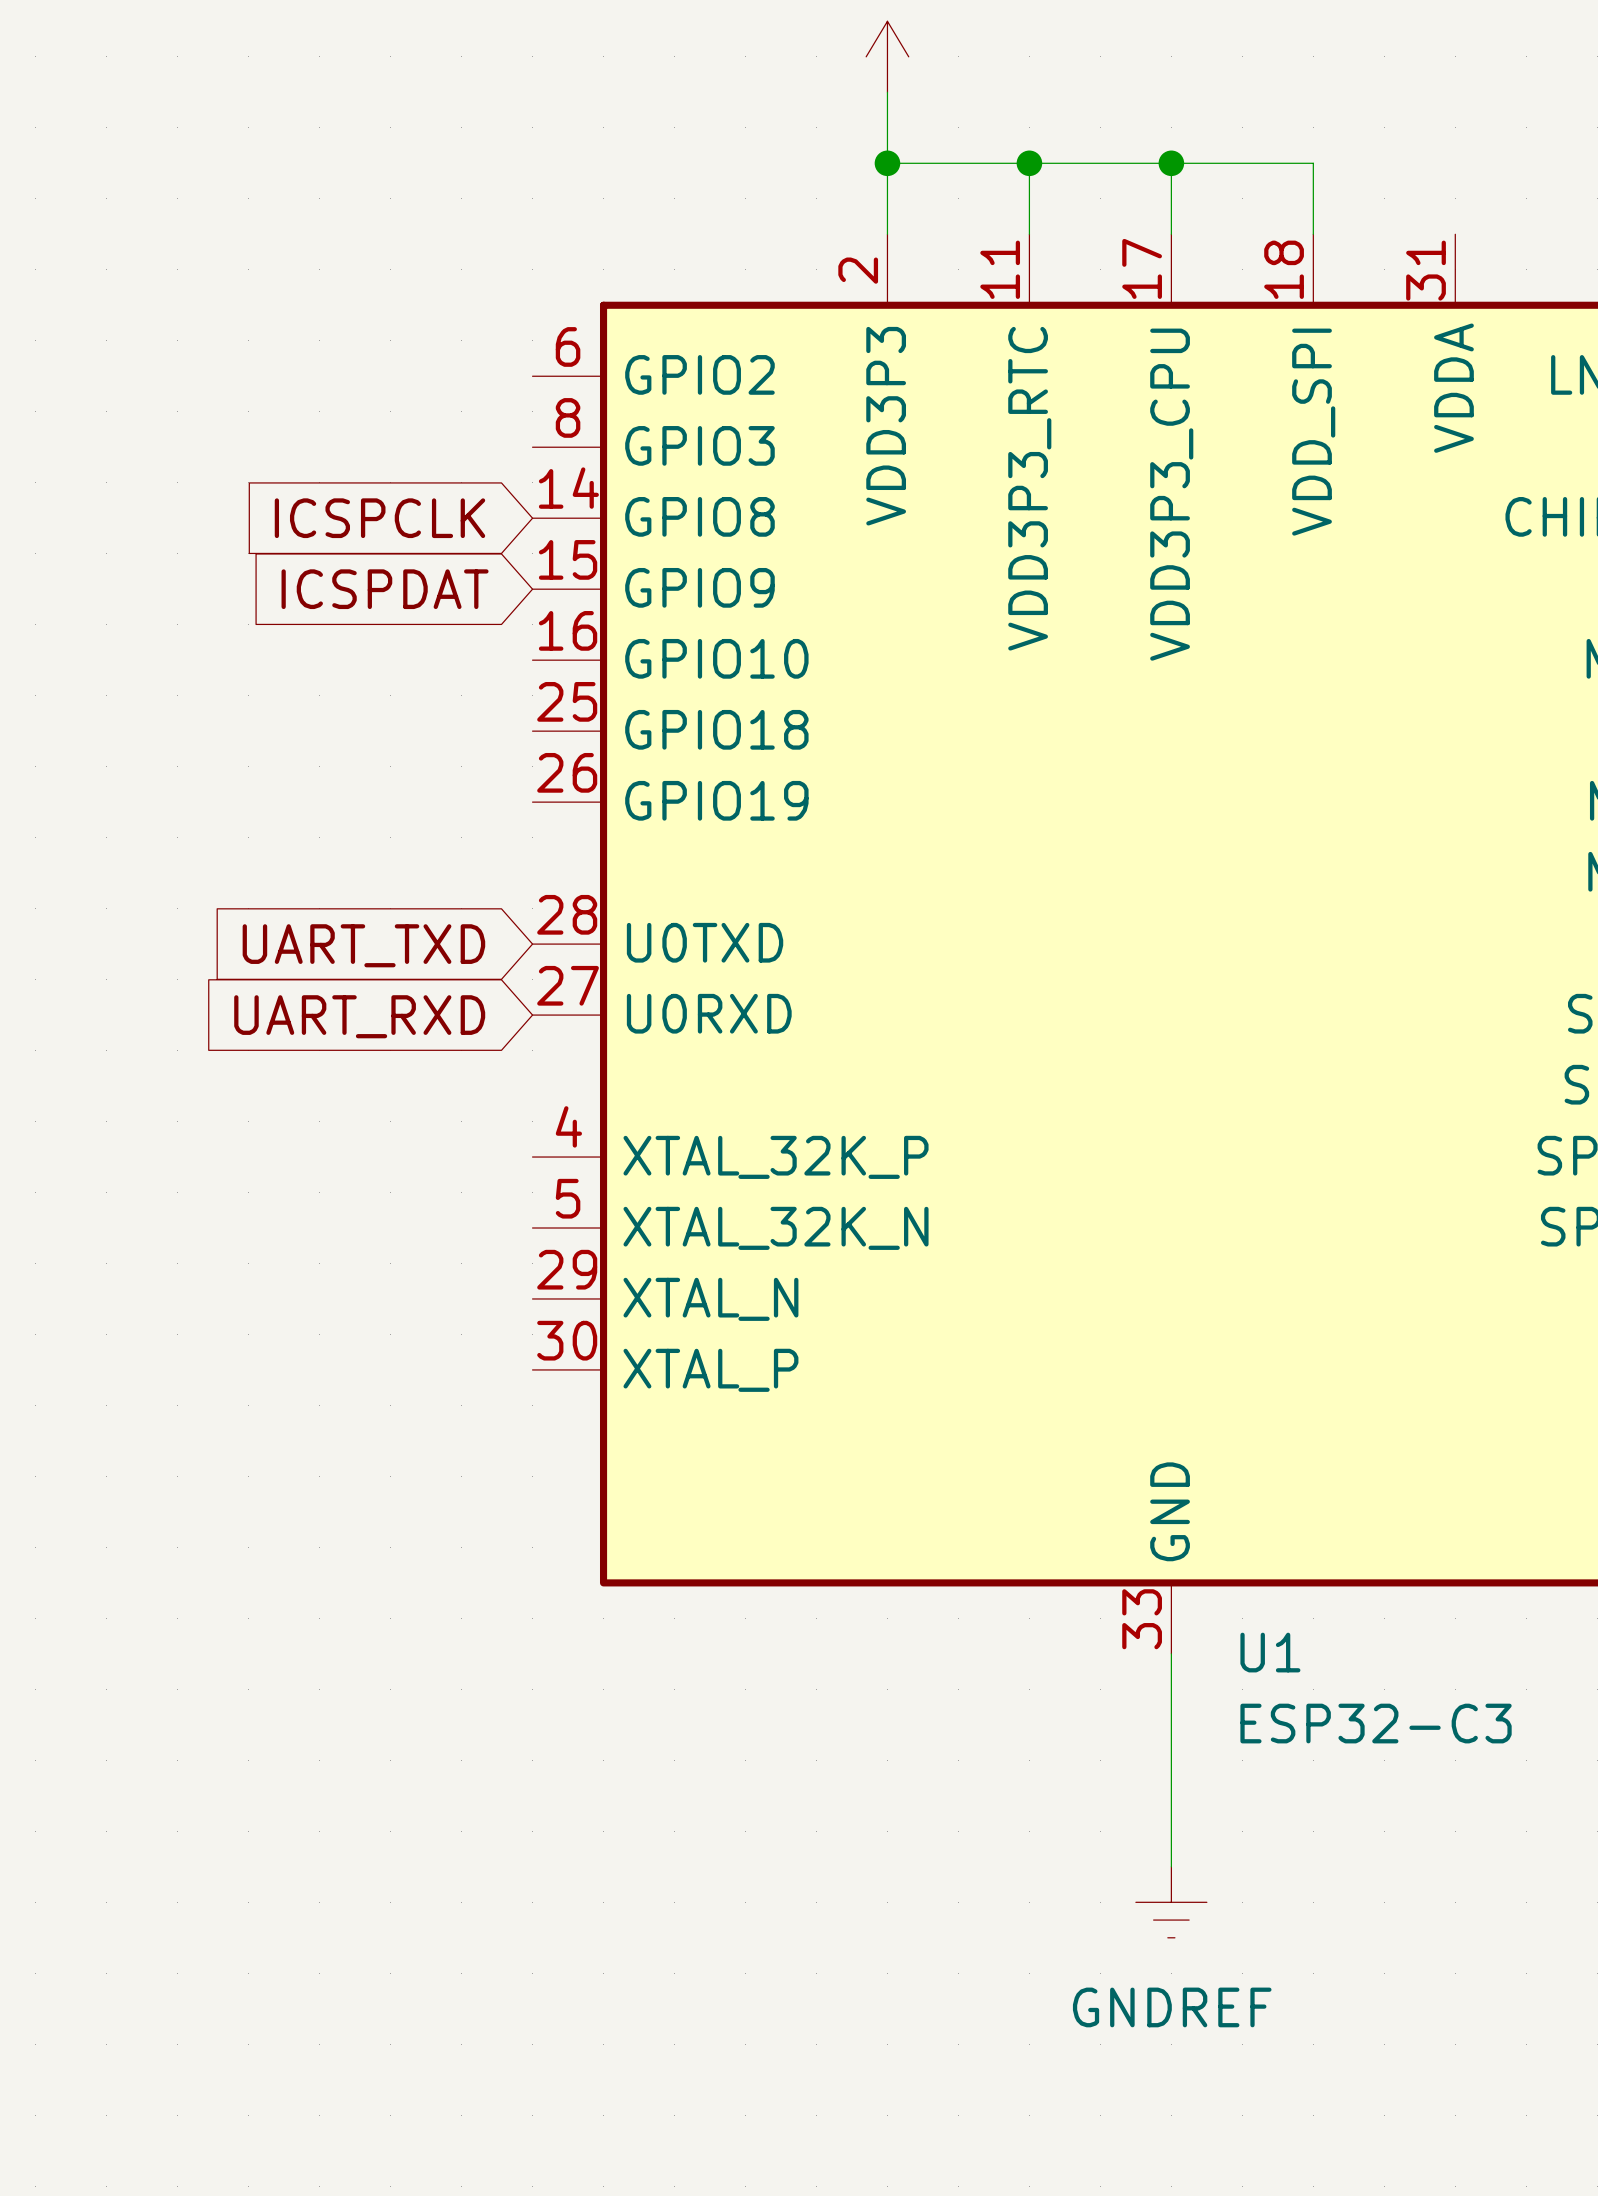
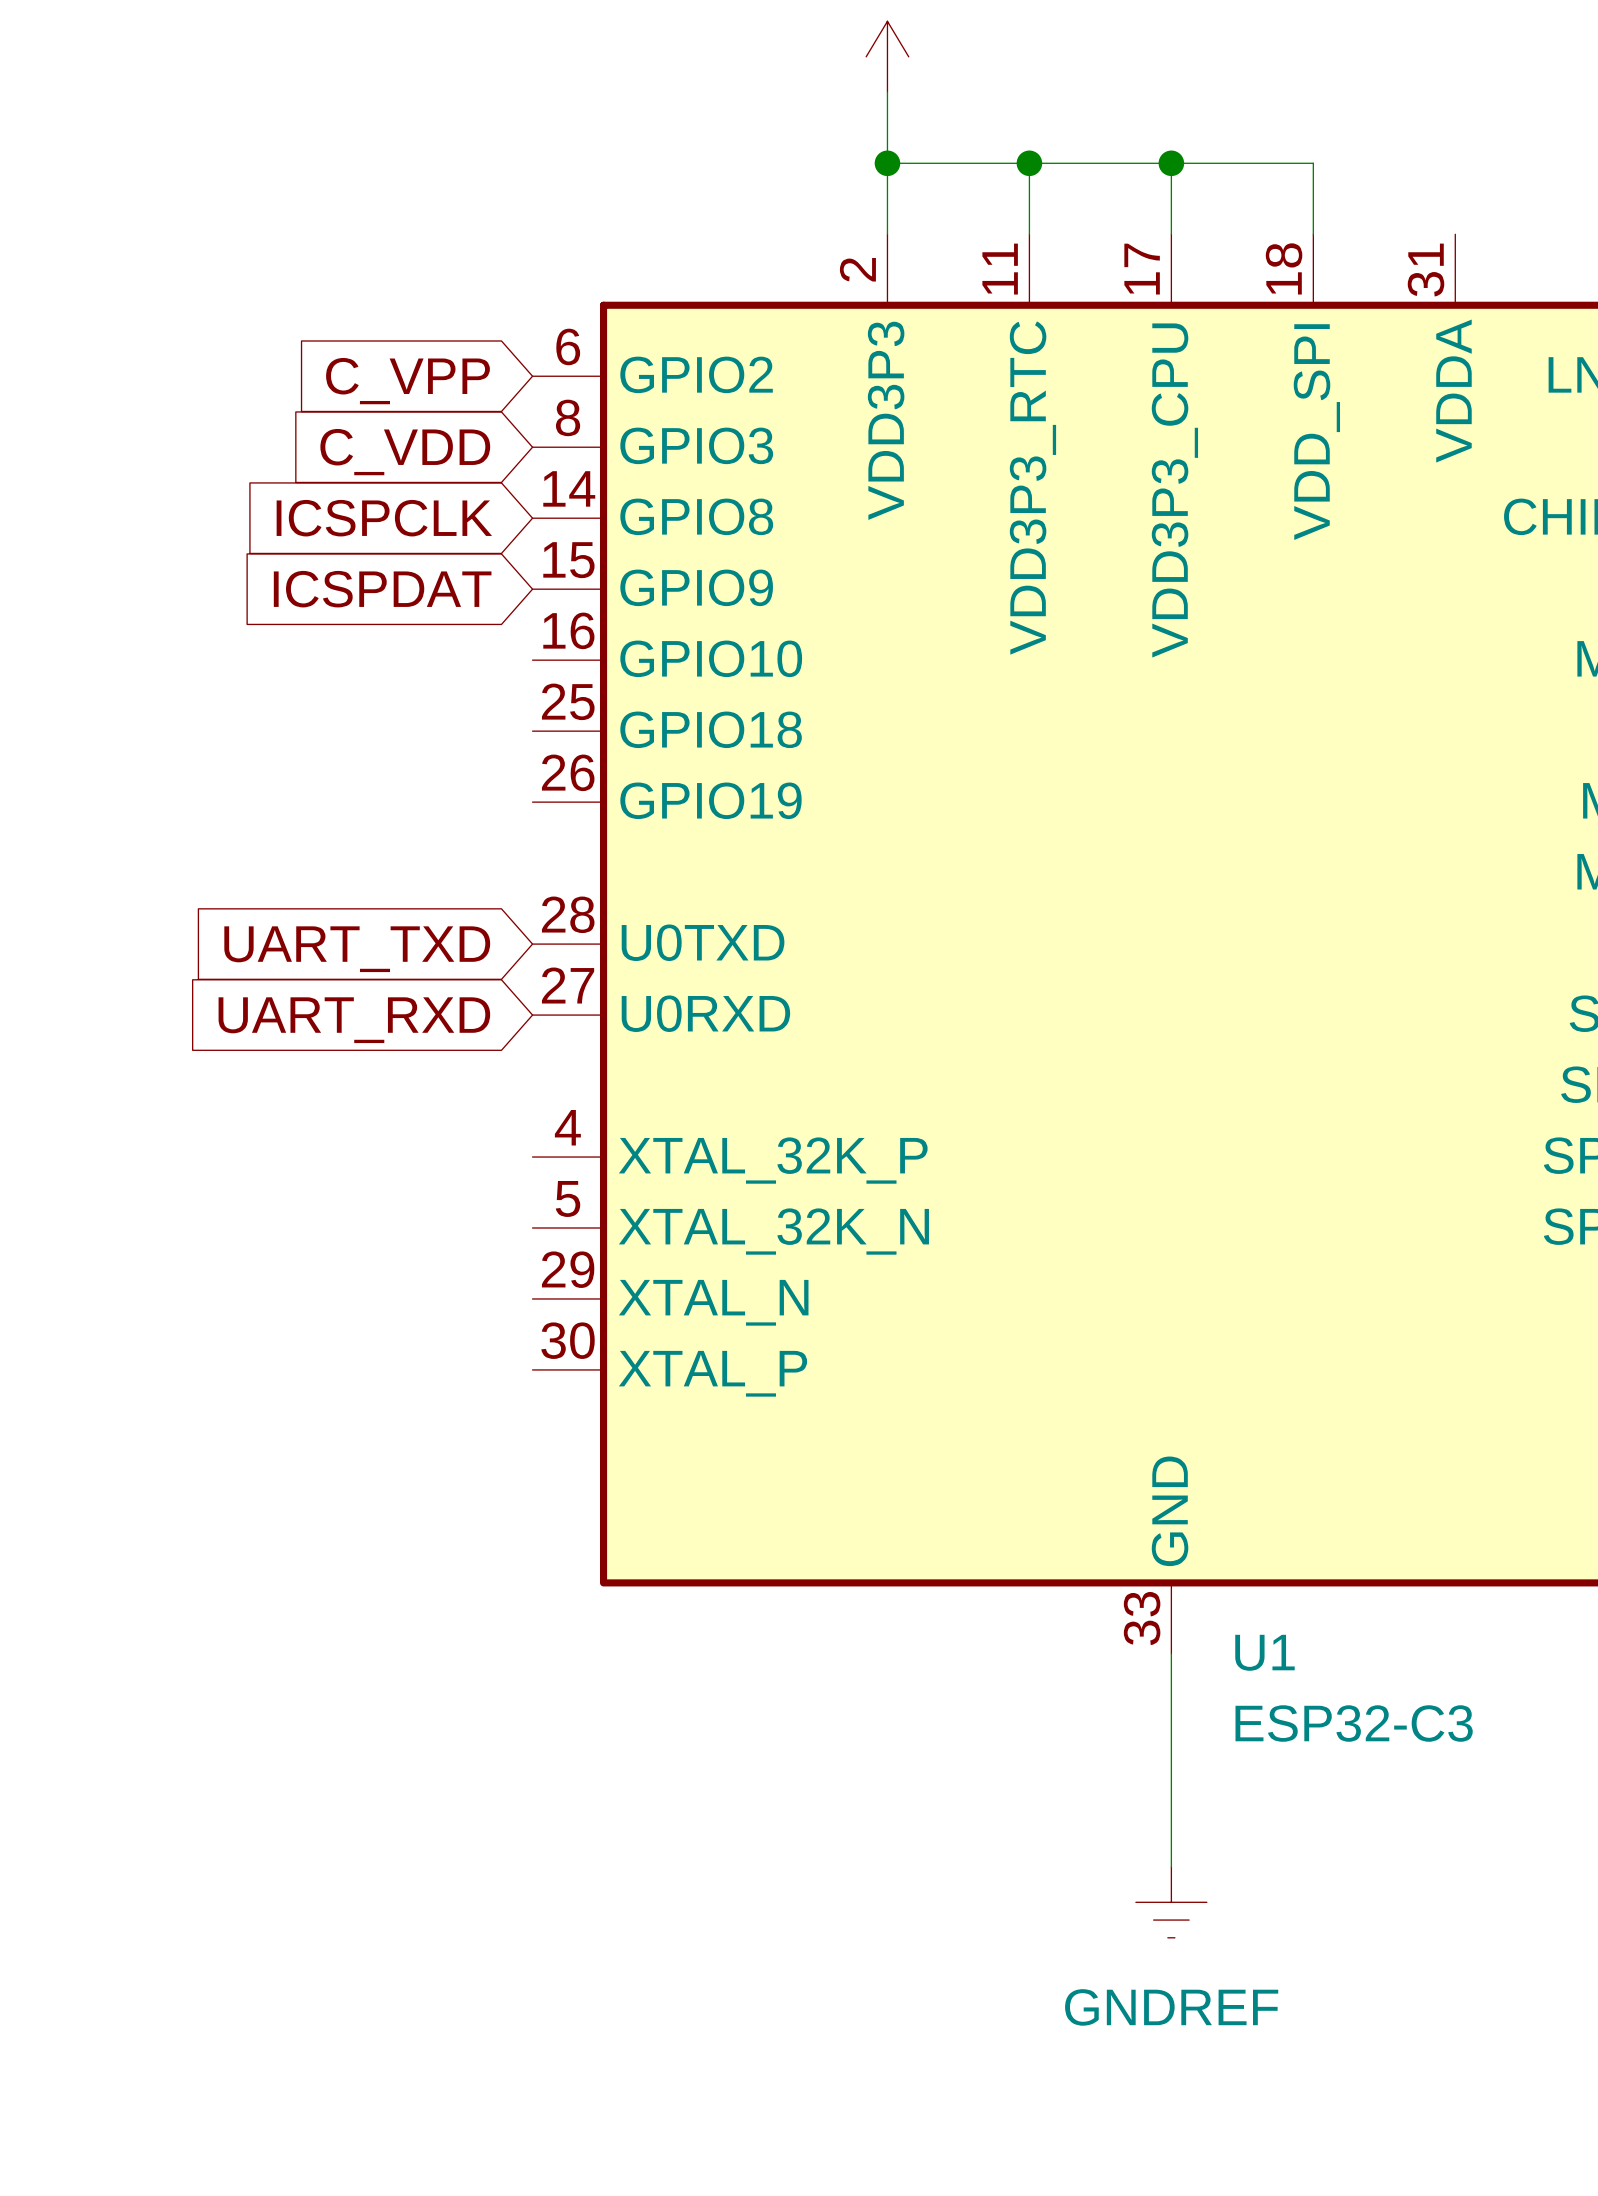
global label: none -> C_VPP (407, 381)
global label: none -> C_VDD (405, 452)

